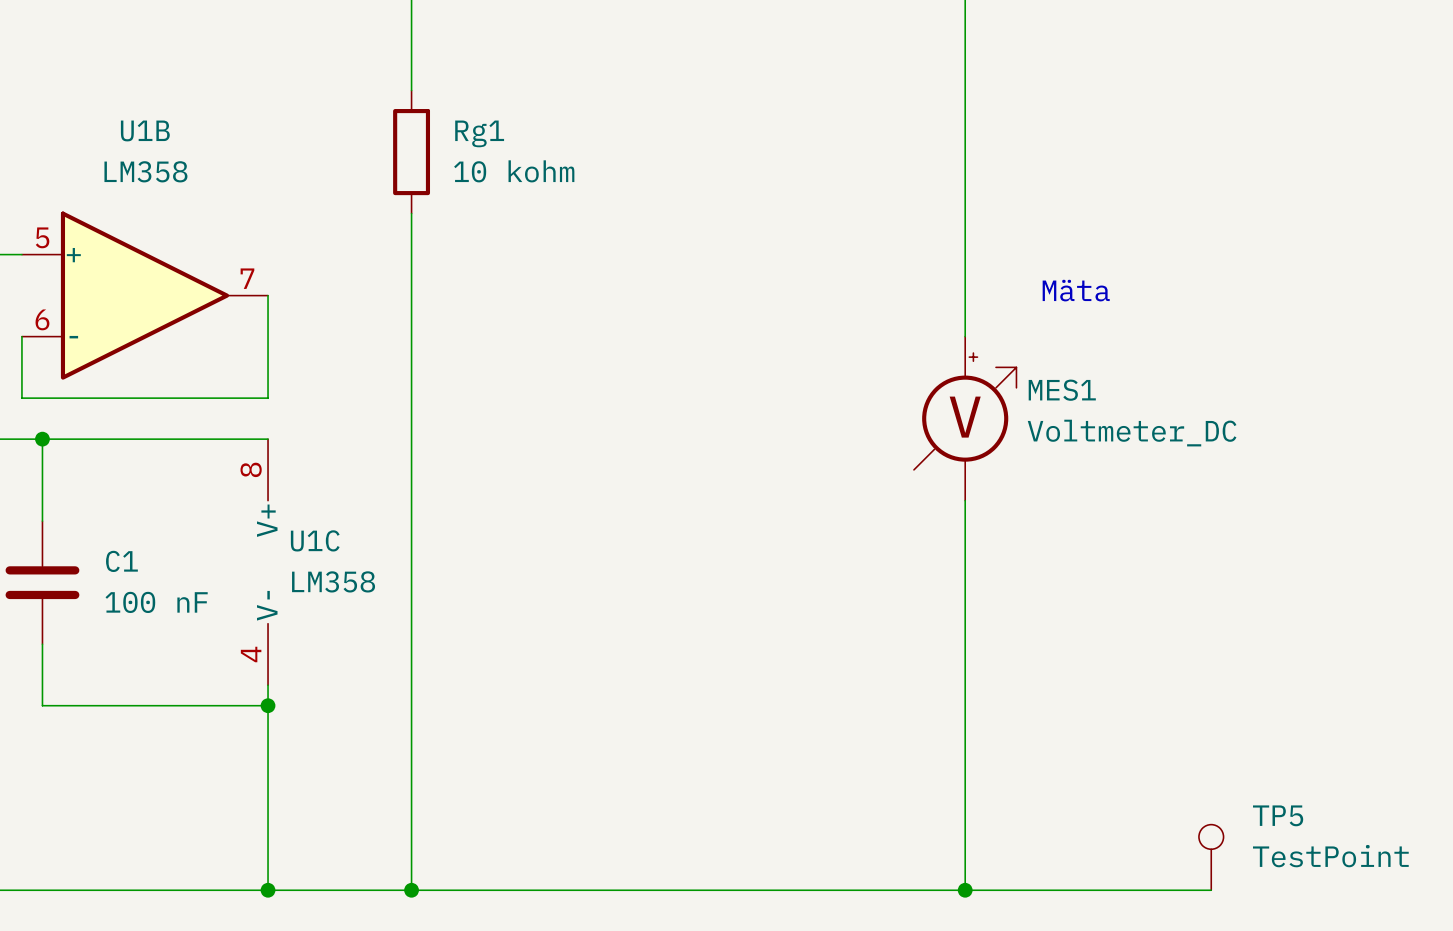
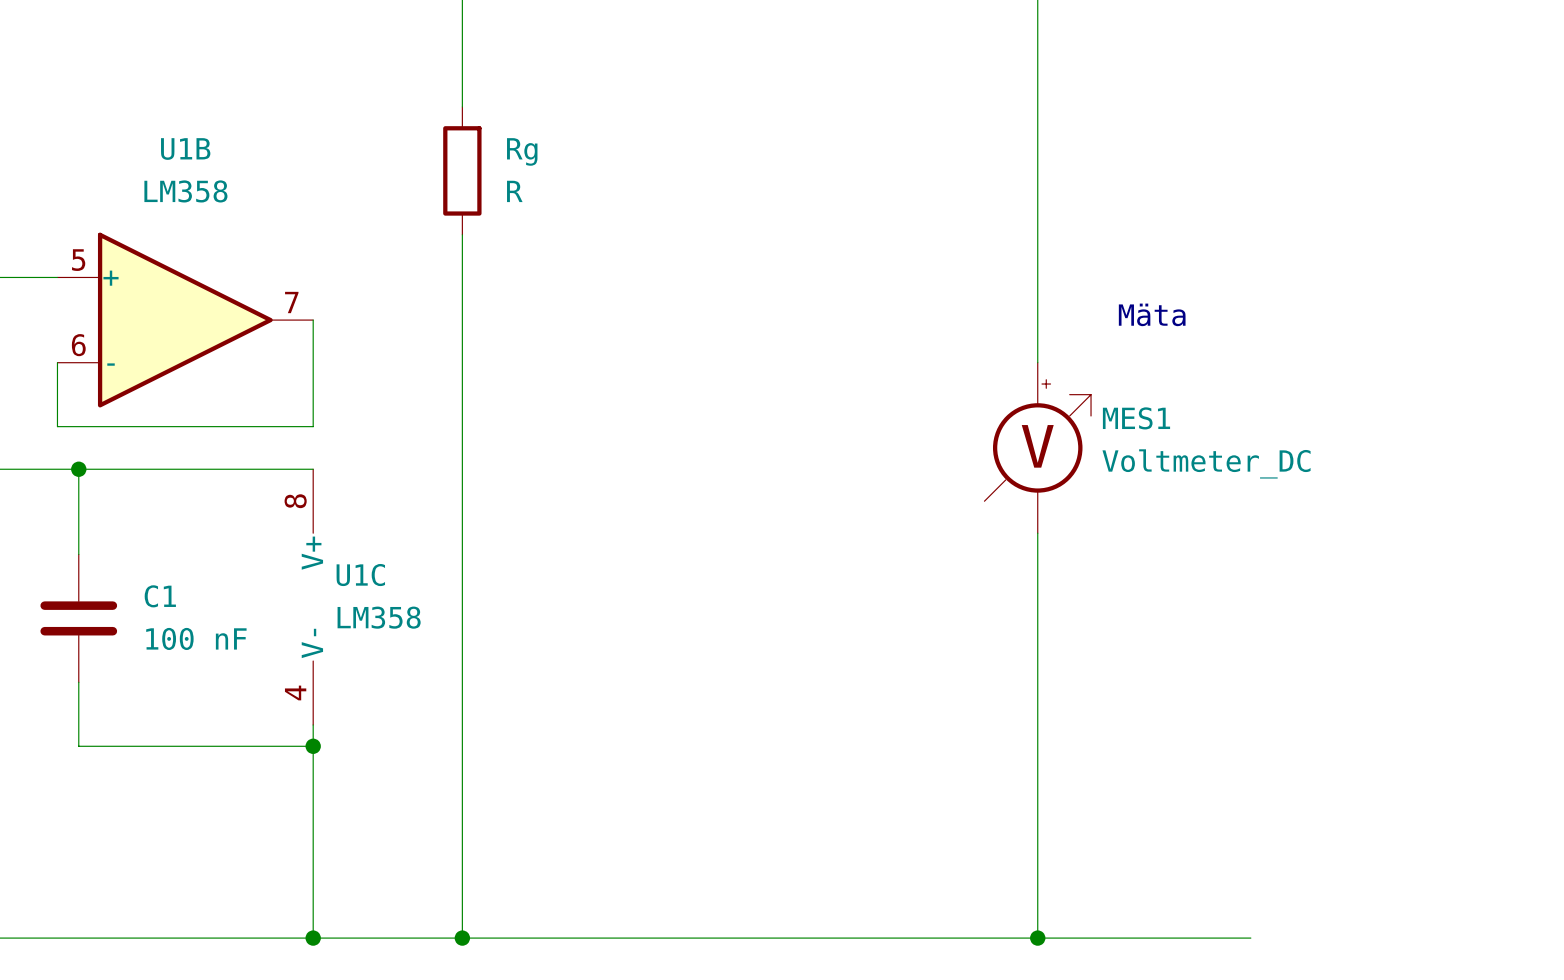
Rg1 name: Rg1 (479, 133) -> Rg (522, 151)
Rg1 value: 10 kohm (514, 171) -> R (514, 191)
TP5: TestPoint (1211, 857) -> none
wire: (1170, 890) (1211, 890) -> none

